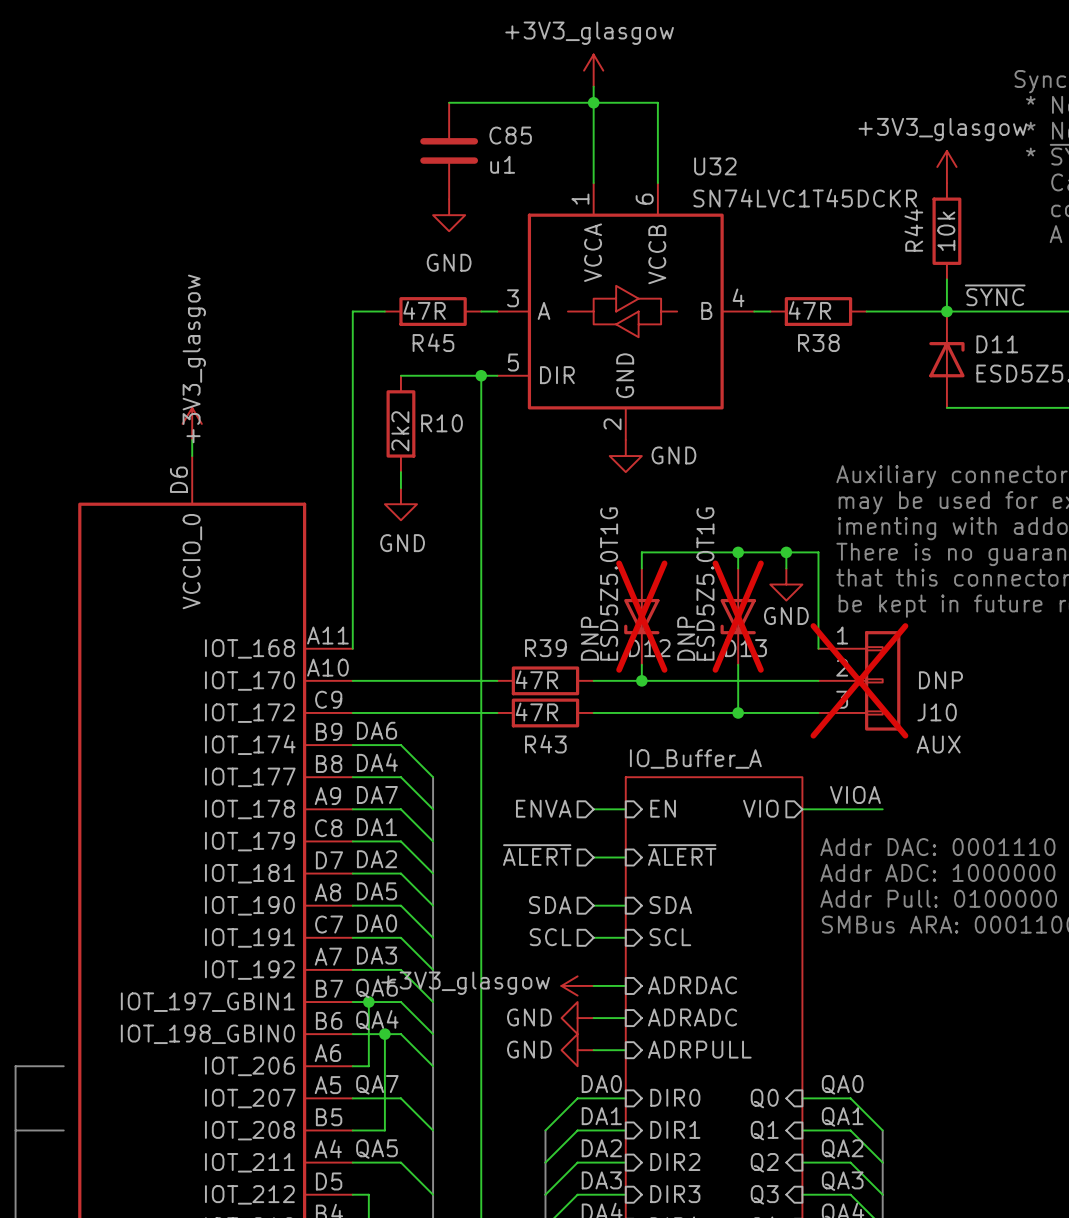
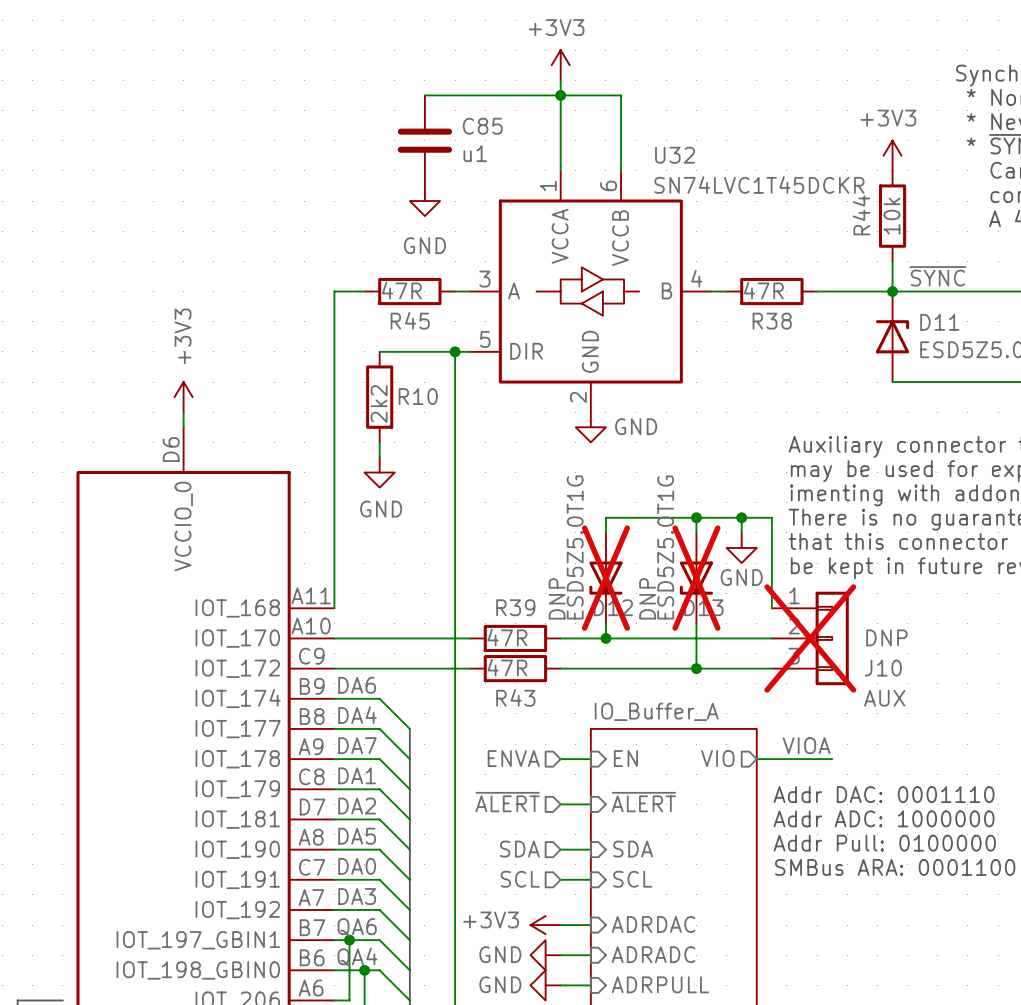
power symbol: +3V3_glasgow (593, 70) -> +3V3 (560, 65)
power symbol: +3V3_glasgow (946, 167) -> +3V3 (892, 155)
power symbol: +3V3_glasgow (192, 423) -> +3V3 (183, 397)
power symbol: +3V3_glasgow (577, 985) -> +3V3 (545, 925)

